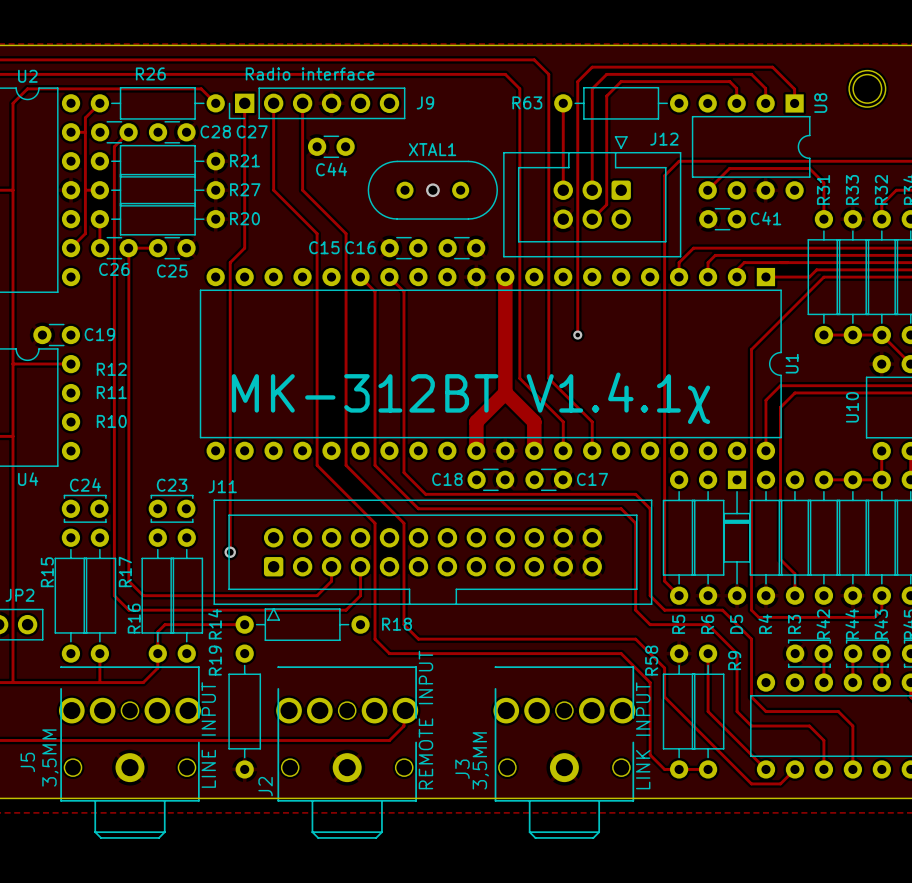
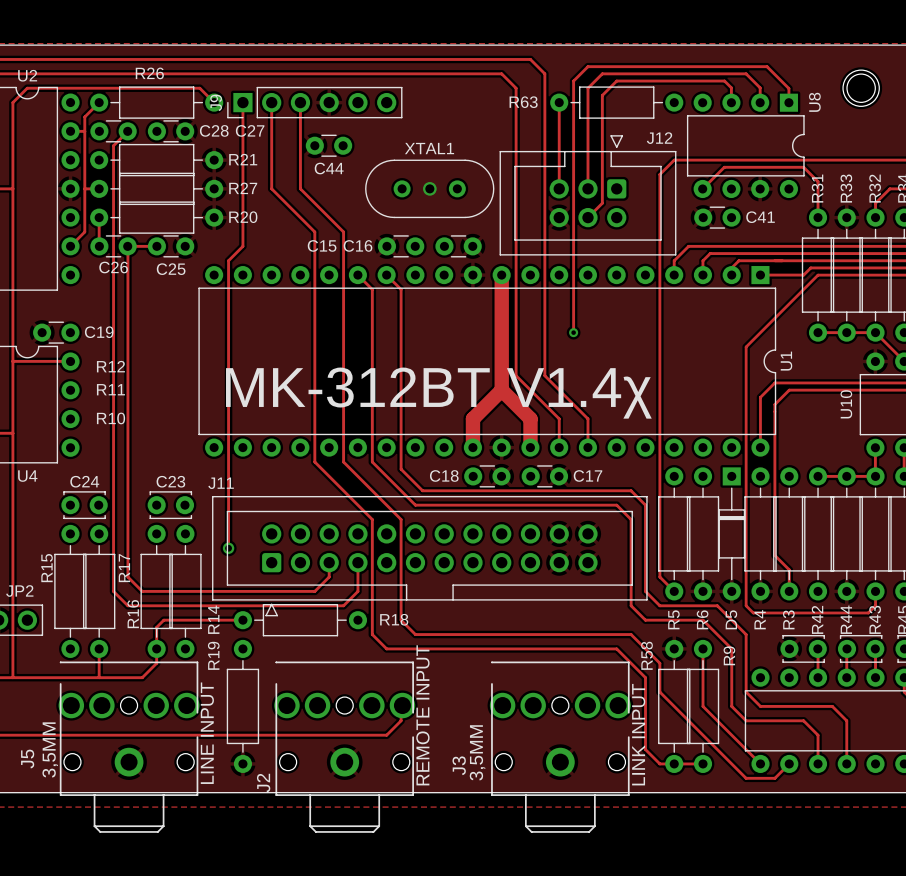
J9 text: Radio interface (310, 73) -> none
J9 name rotation: 0° (425, 102) -> 90° counterclockwise (216, 102)
J9 name position: J9 (425, 102) -> J9 (216, 102)
text: MK-312BT V1.4.1χ (470, 398) -> MK-312BT V1.4χ (438, 393)

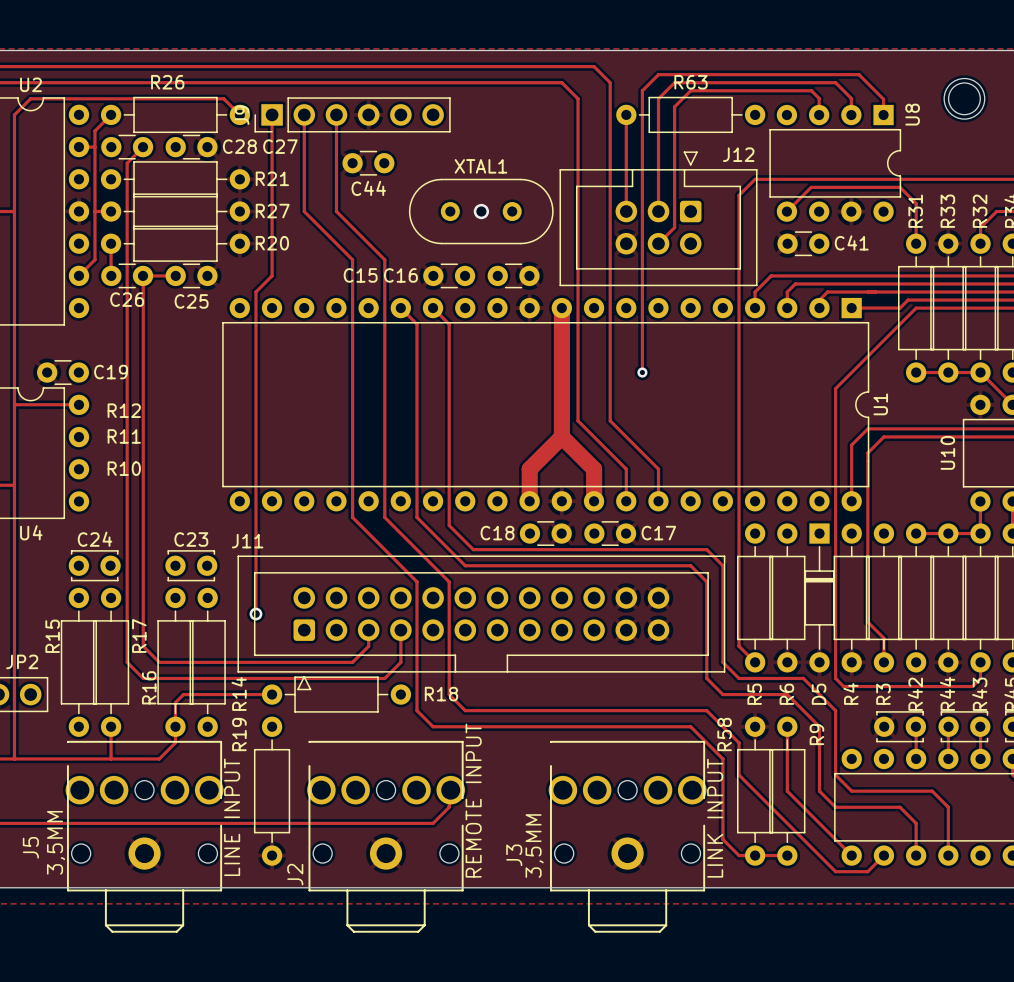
R63 name position: R63 (523, 102) -> R63 (691, 82)
text: MK-312BT V1.4χ (438, 393) -> none

